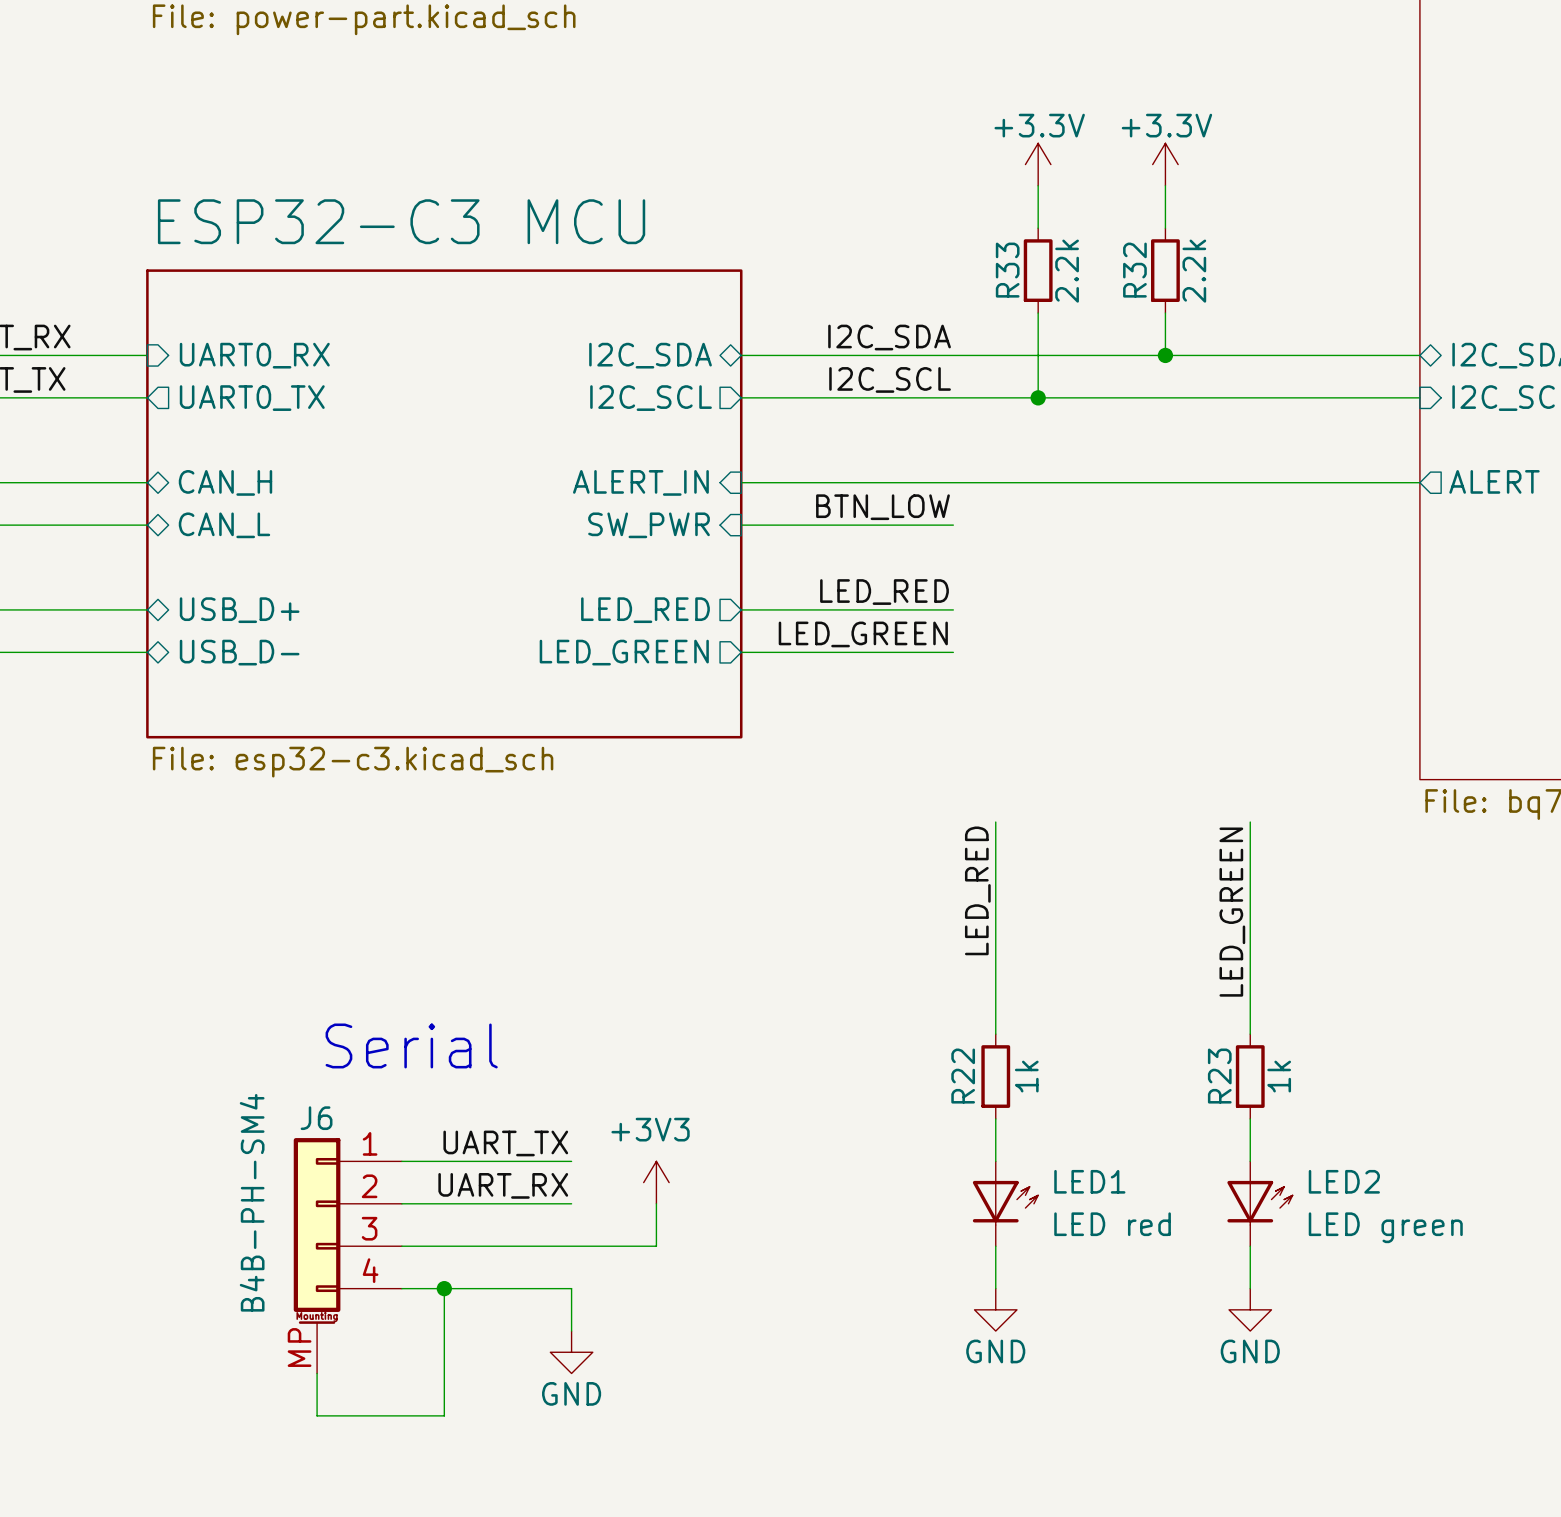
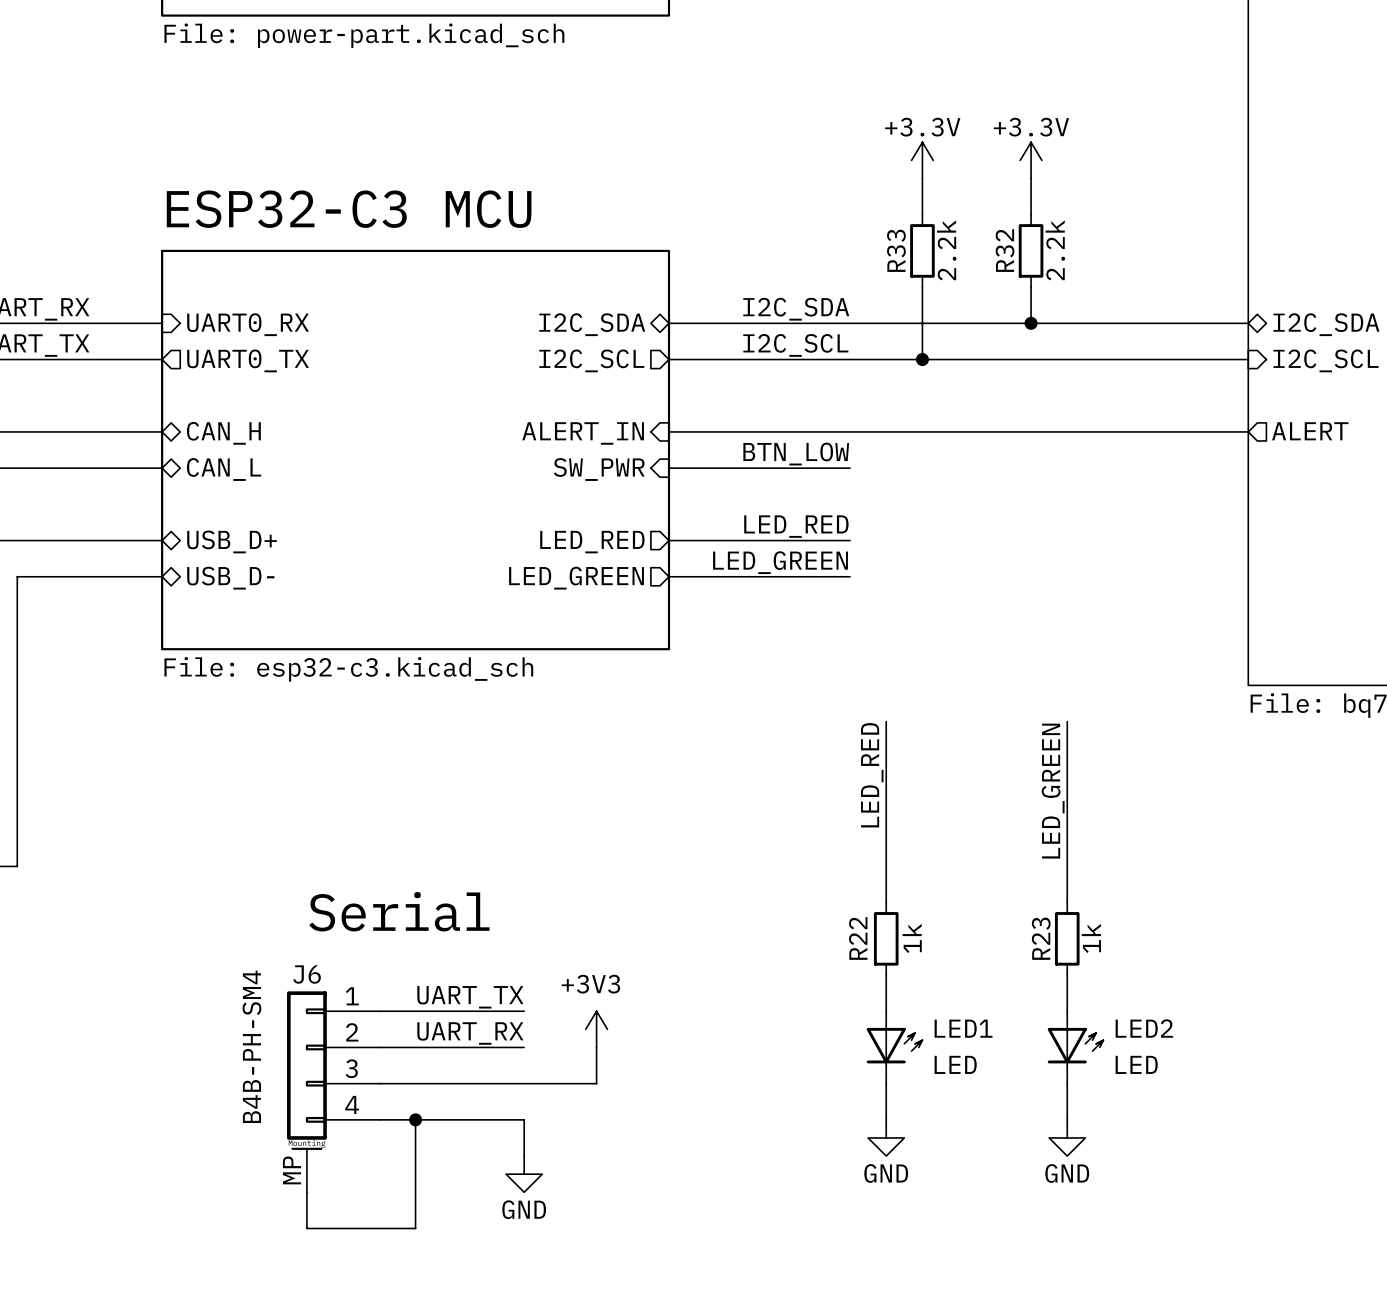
wire: (1250, 822) (1250, 1034) -> (1067, 721) (1067, 902)
label position: LED_GREEN (1232, 912) -> LED_GREEN (1053, 791)
R23 position: (1250, 1076) -> (1067, 938)
wire: (1250, 1118) (1250, 1161) -> (1067, 975) (1067, 1011)
LED2 position: (1260, 1203) -> (1075, 1047)
LED1 value: LED red (1112, 1224) -> LED (955, 1064)
LED2 value: LED green (1385, 1227) -> LED (1136, 1064)
wire: (1250, 1246) (1250, 1288) -> (1067, 1083) (1067, 1119)
power symbol position: GND (1250, 1309) -> GND (1067, 1137)

